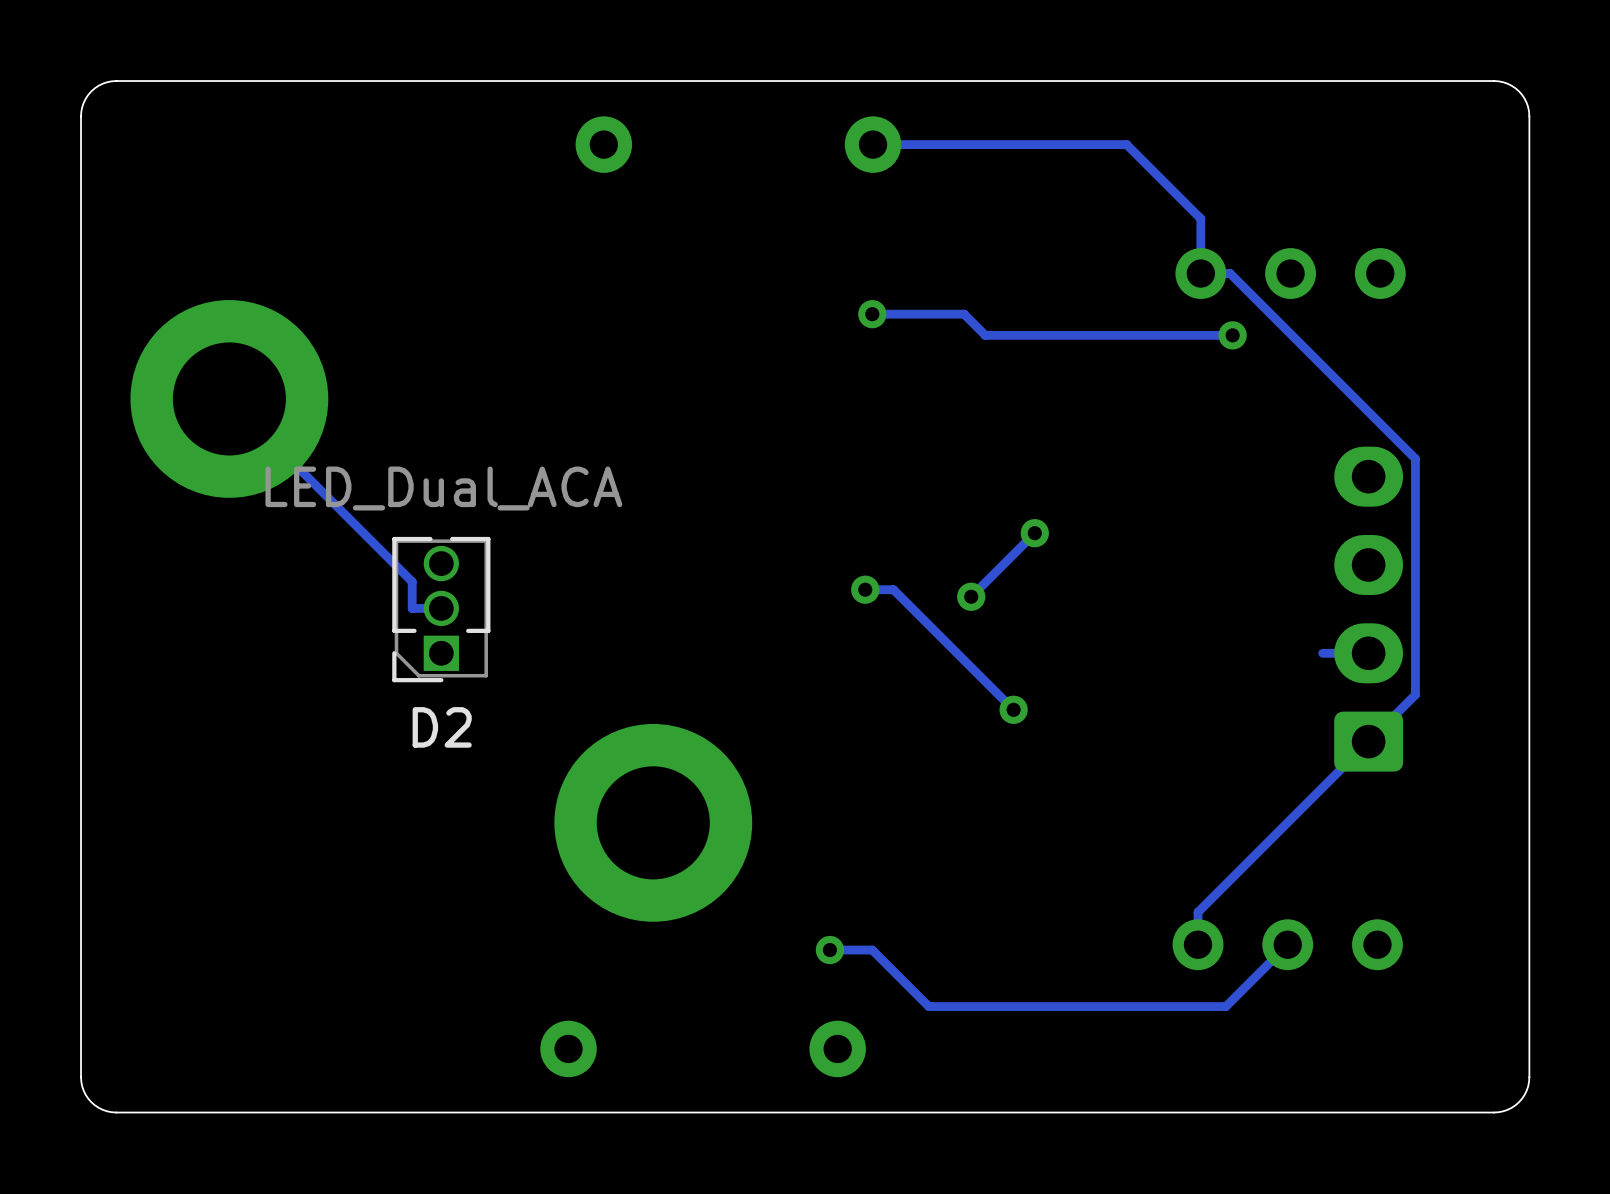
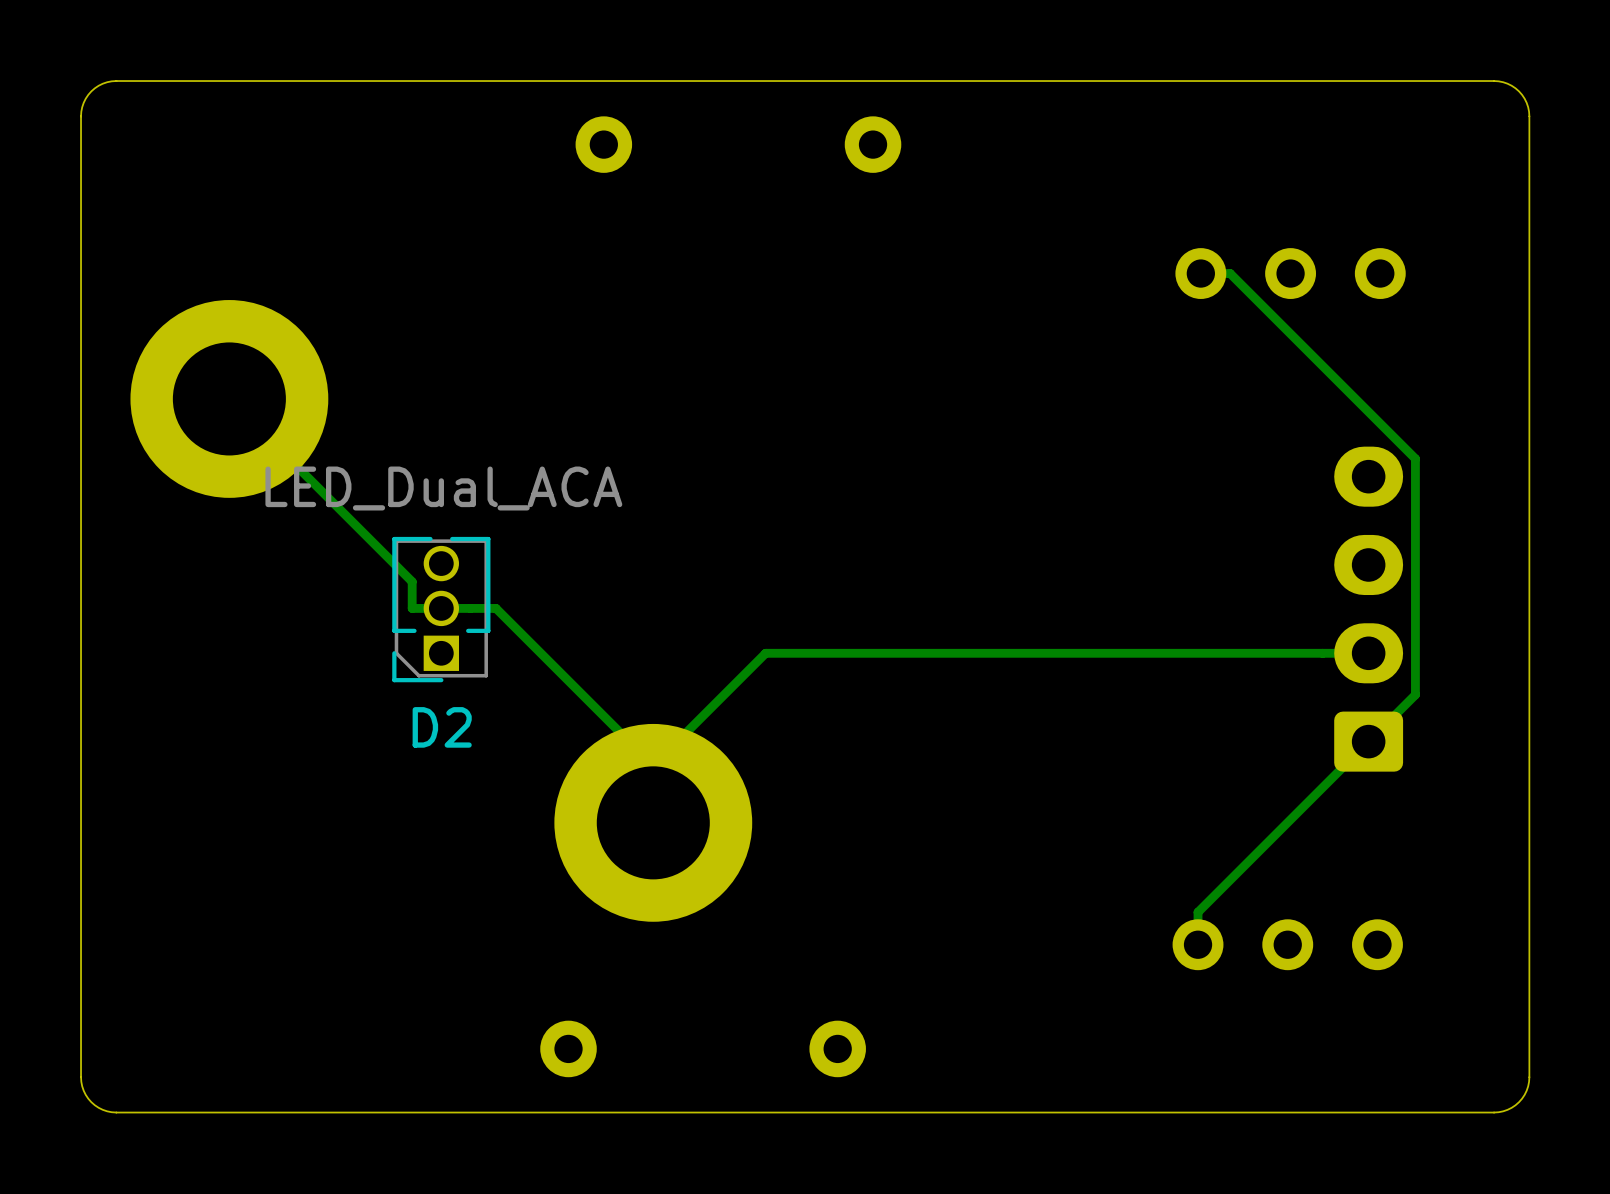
track: (873, 144) (1126, 144) (1200, 218) (1200, 273) -> none
track: (872, 314) (964, 314) (985, 335) (1232, 335) -> none
via: (872, 314) -> none
via: (1232, 335) -> none
track: (1034, 533) (971, 596) -> none
via: (1034, 533) -> none
track: (865, 589) (893, 589) (1013, 709) -> none
via: (865, 589) -> none
via: (971, 596) -> none
track: none -> (441, 608) (496, 608) (653, 765) (765, 653) (1322, 653)
via: (1013, 709) -> none
track: (1287, 944) (1225, 1006) (928, 1006) (872, 950) (829, 950) -> none
via: (829, 950) -> none

